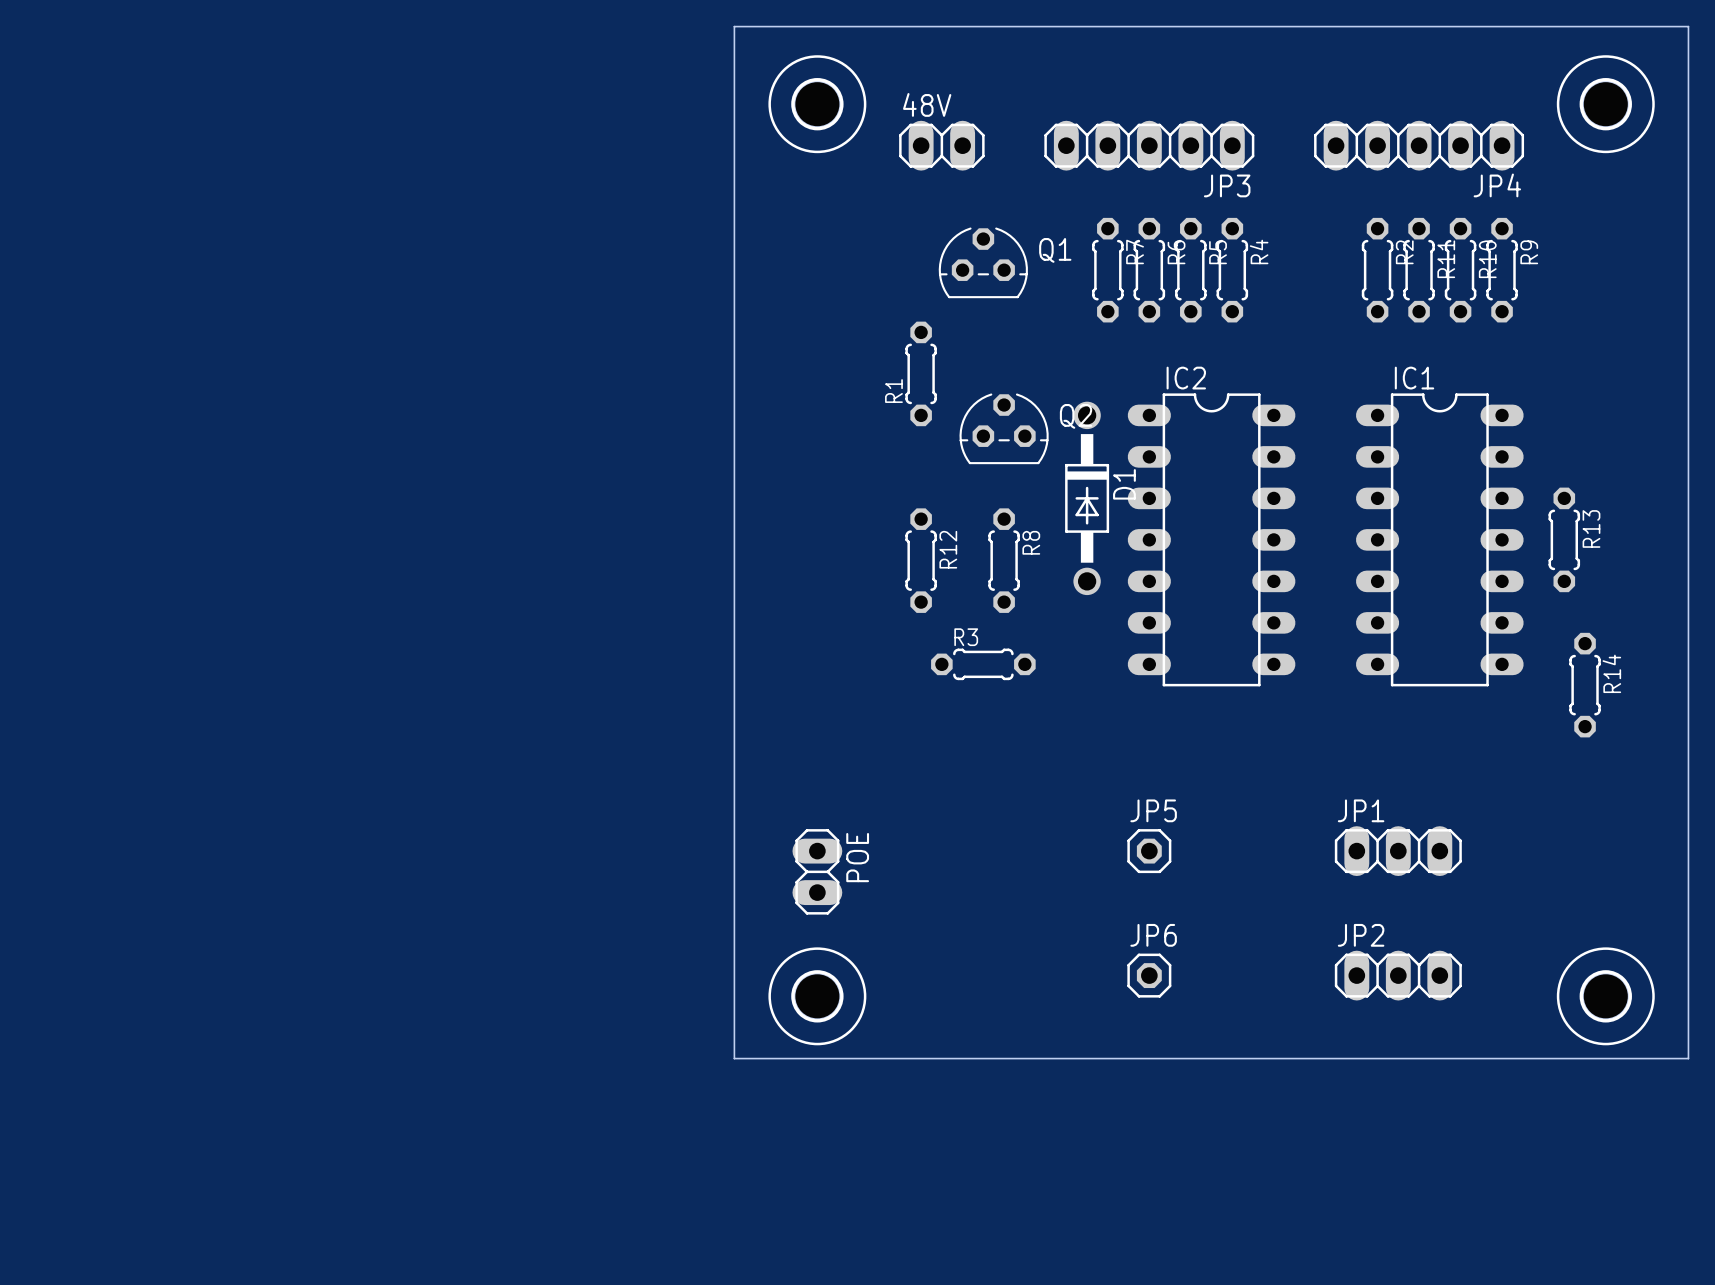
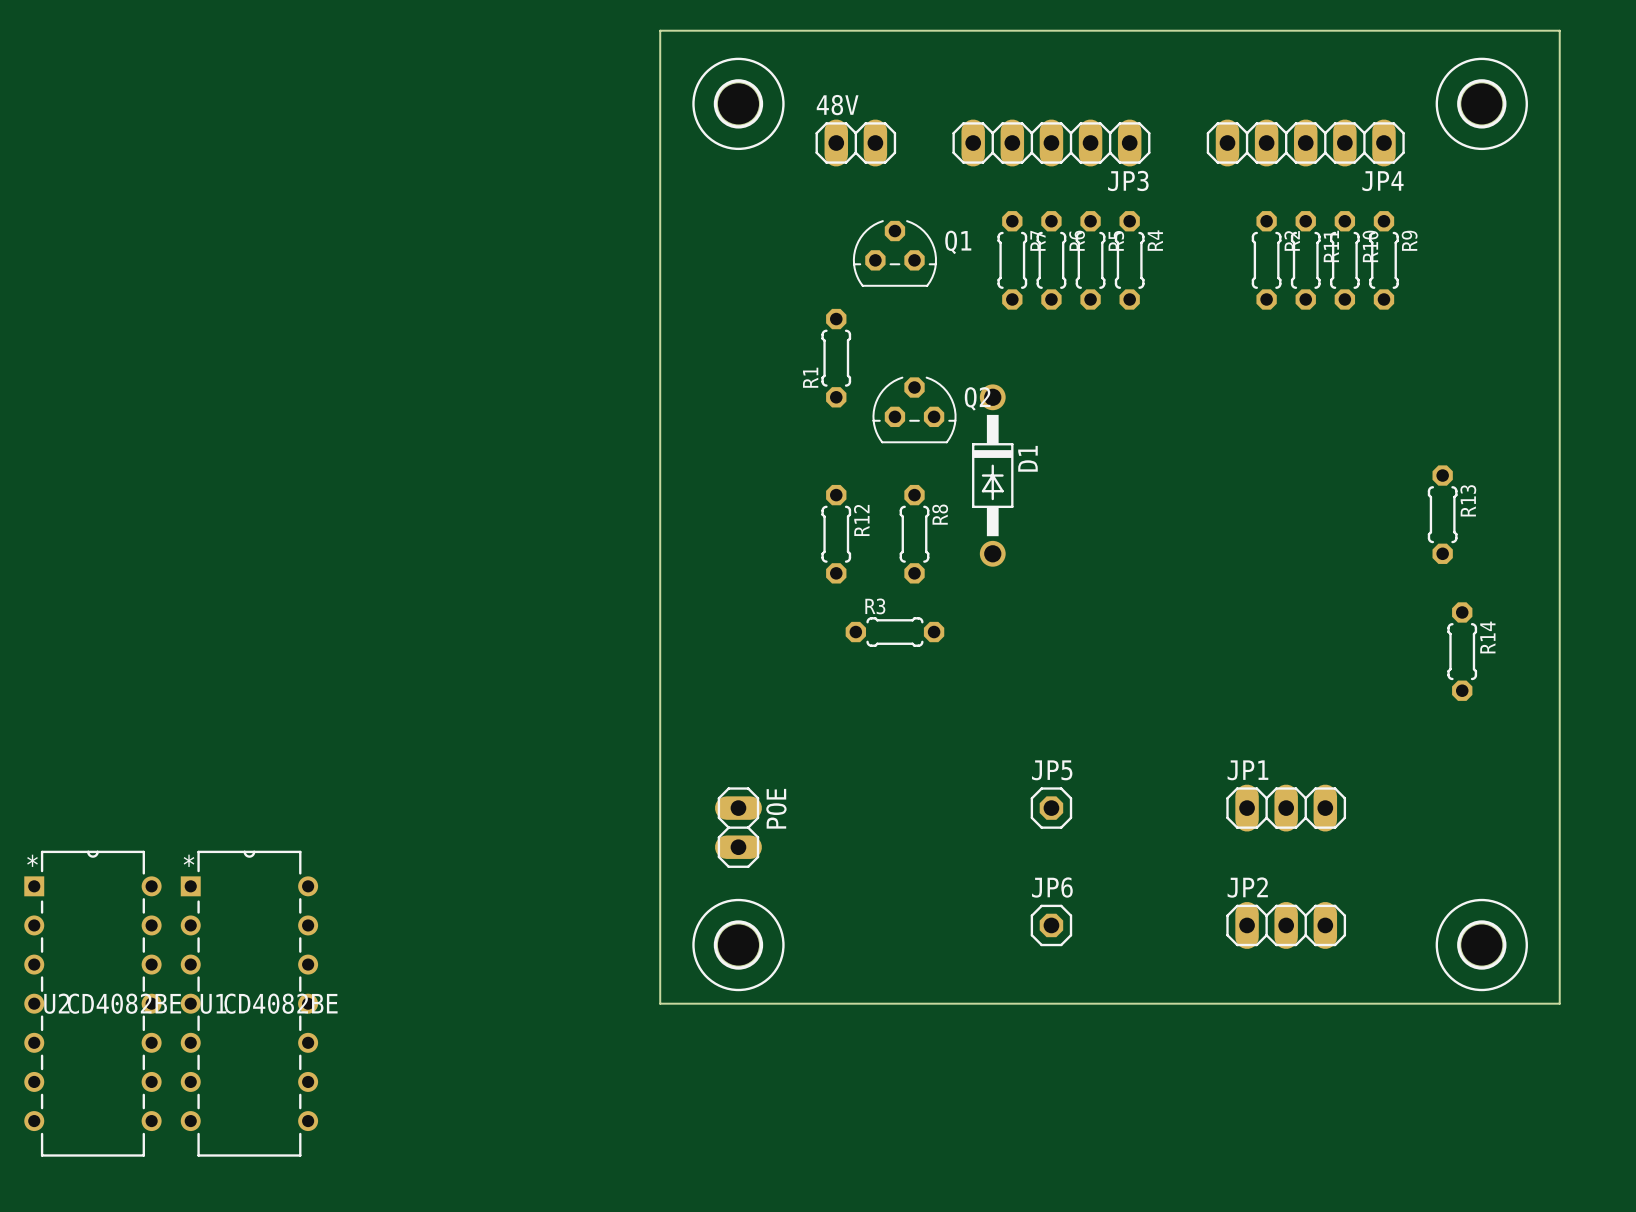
IC2: (1211, 539) -> none
IC1: (1439, 539) -> none
U2: none -> CD4082BE (92, 1003)
U1: none -> CD4082BE (249, 1003)

